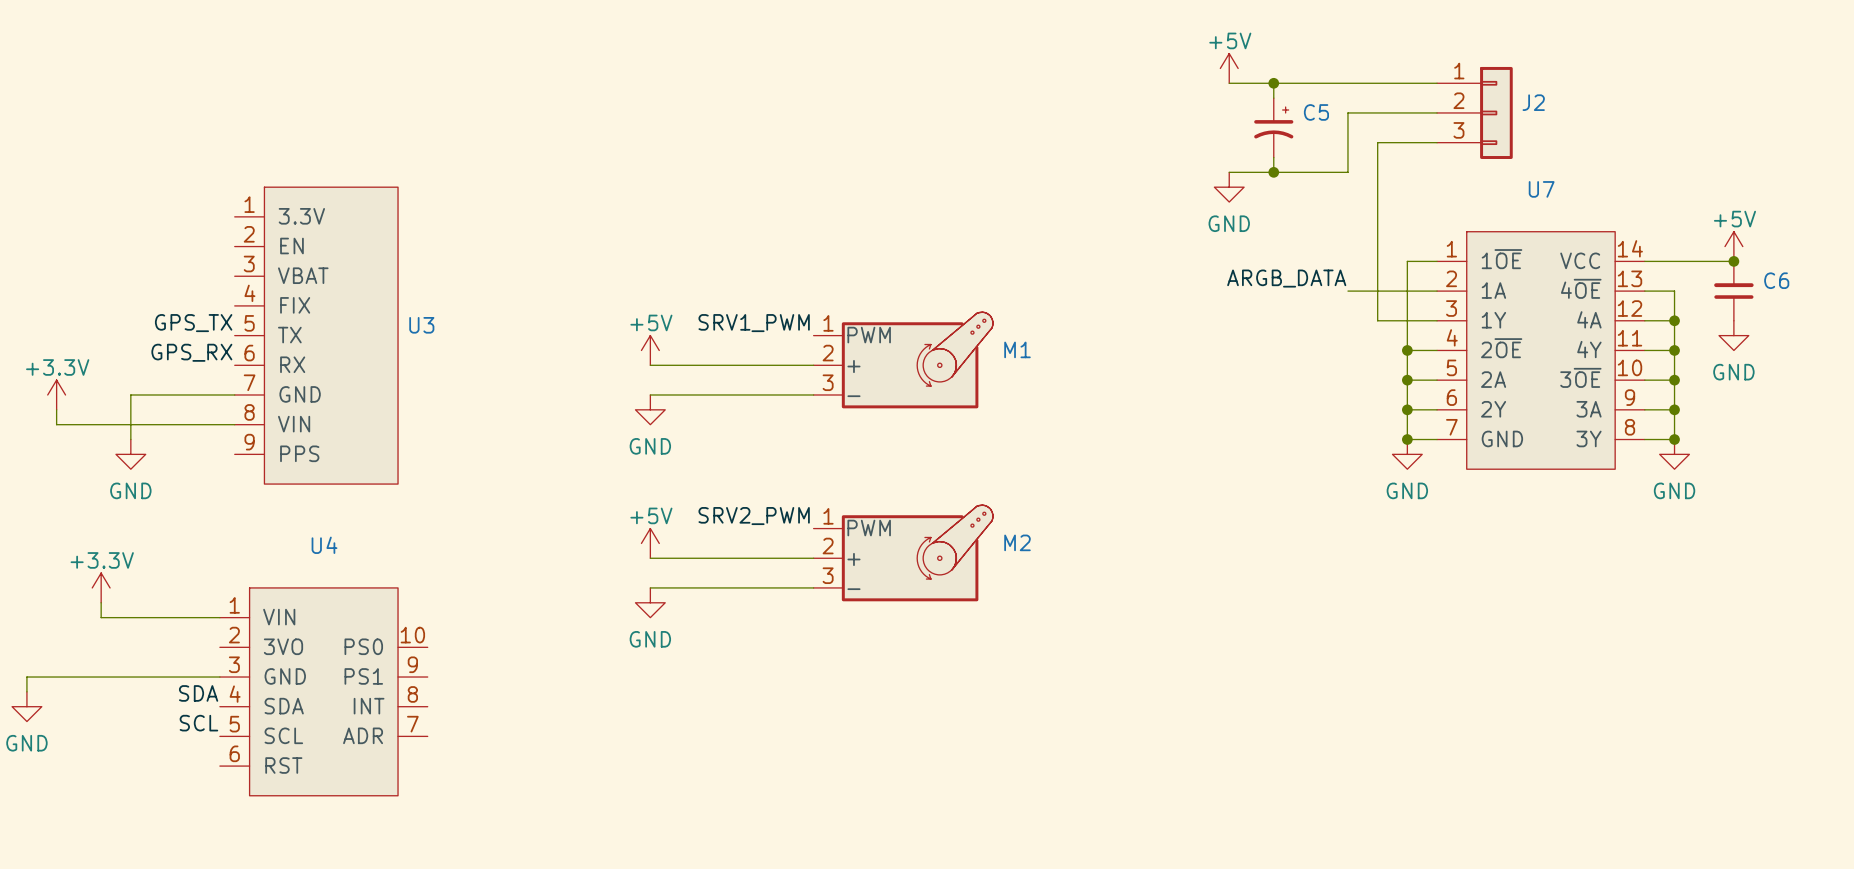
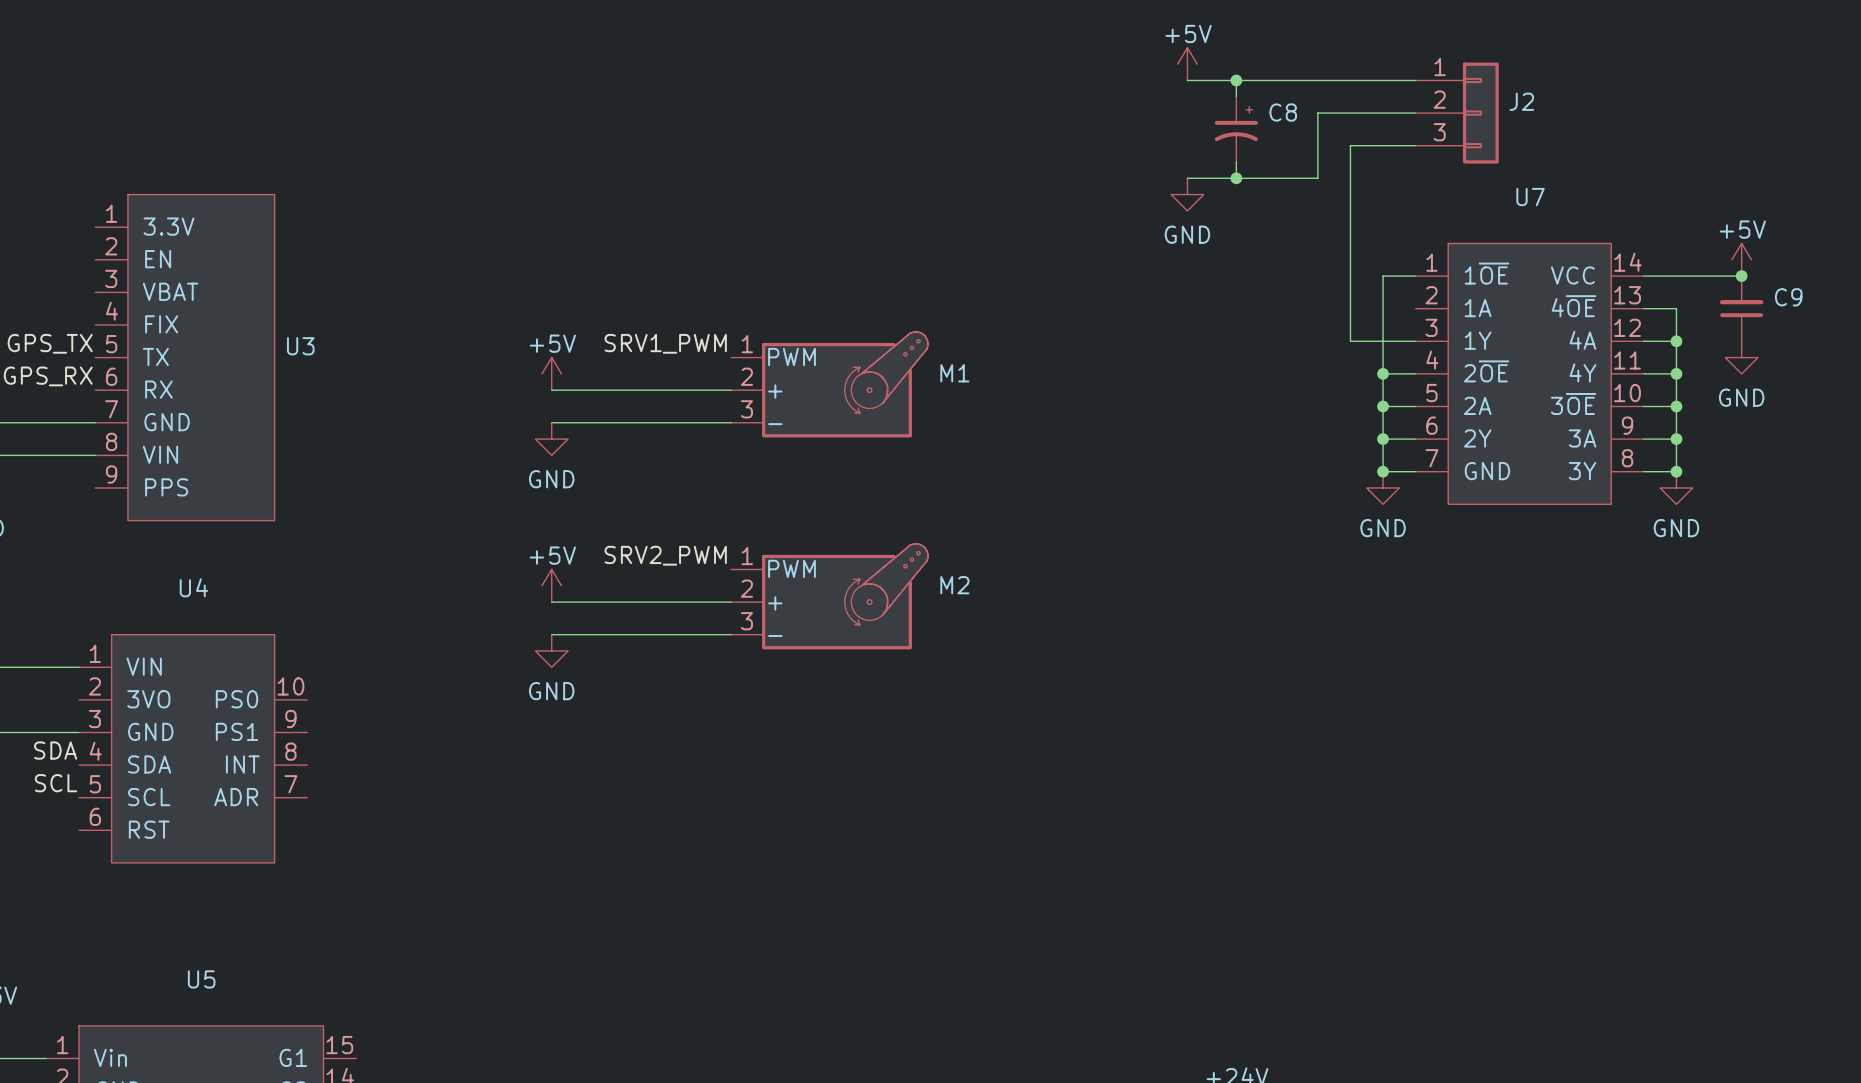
C5 name: C5 (1316, 112) -> C8 (1283, 112)
label: ARGB_DATA (1286, 278) -> none
C6 name: C6 (1776, 280) -> C9 (1788, 297)
wire: (1347, 291) (1437, 291) -> none

